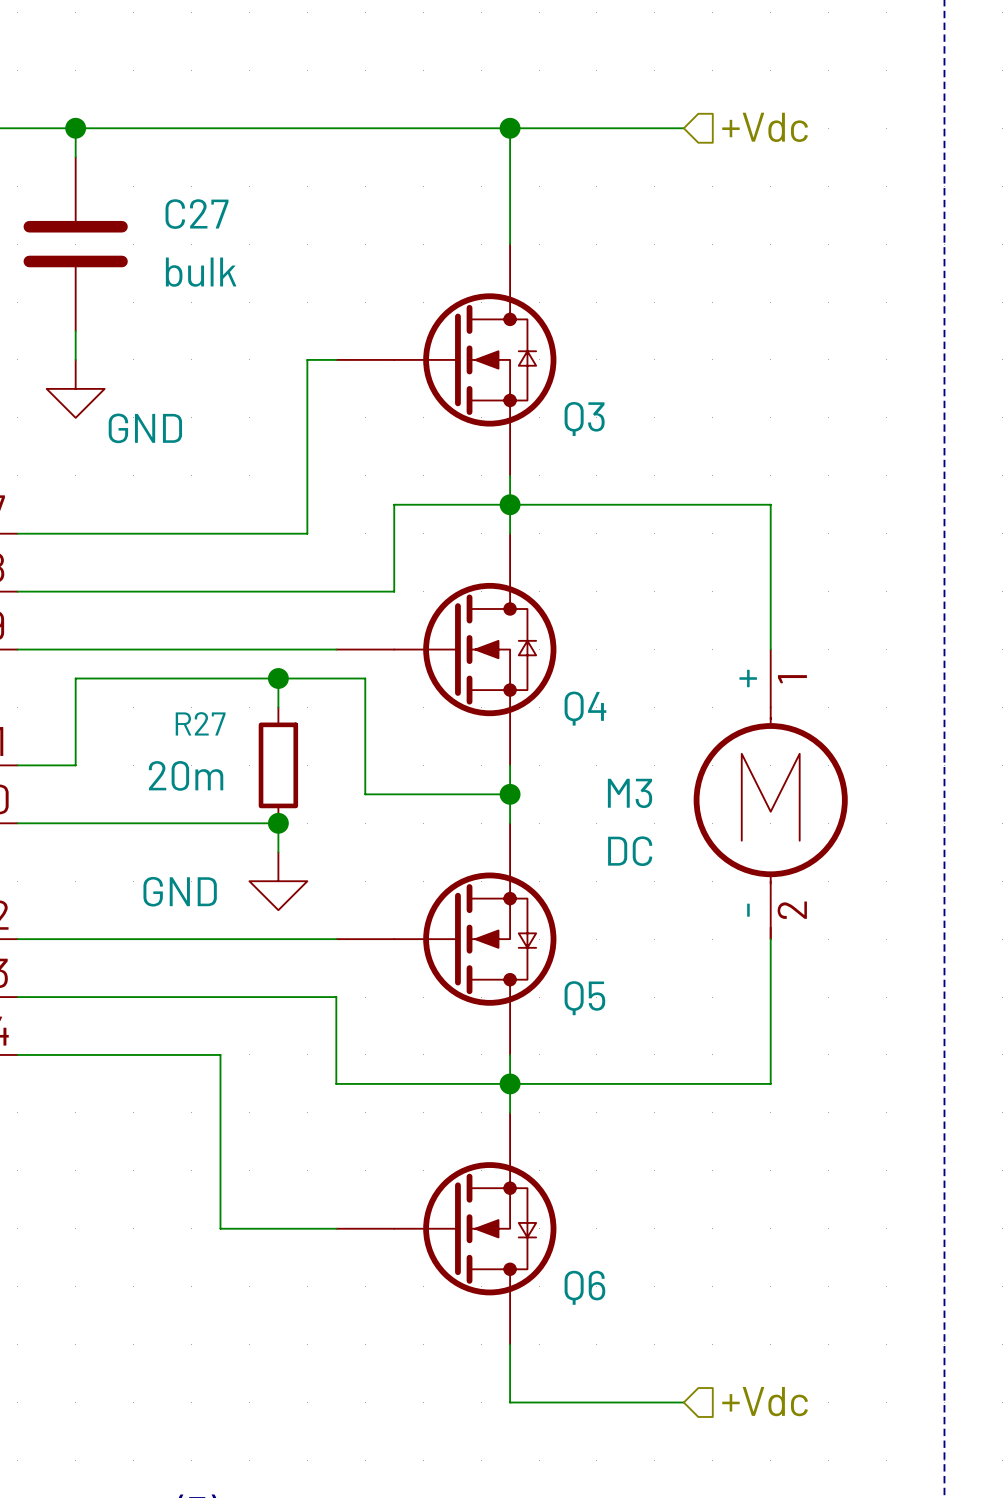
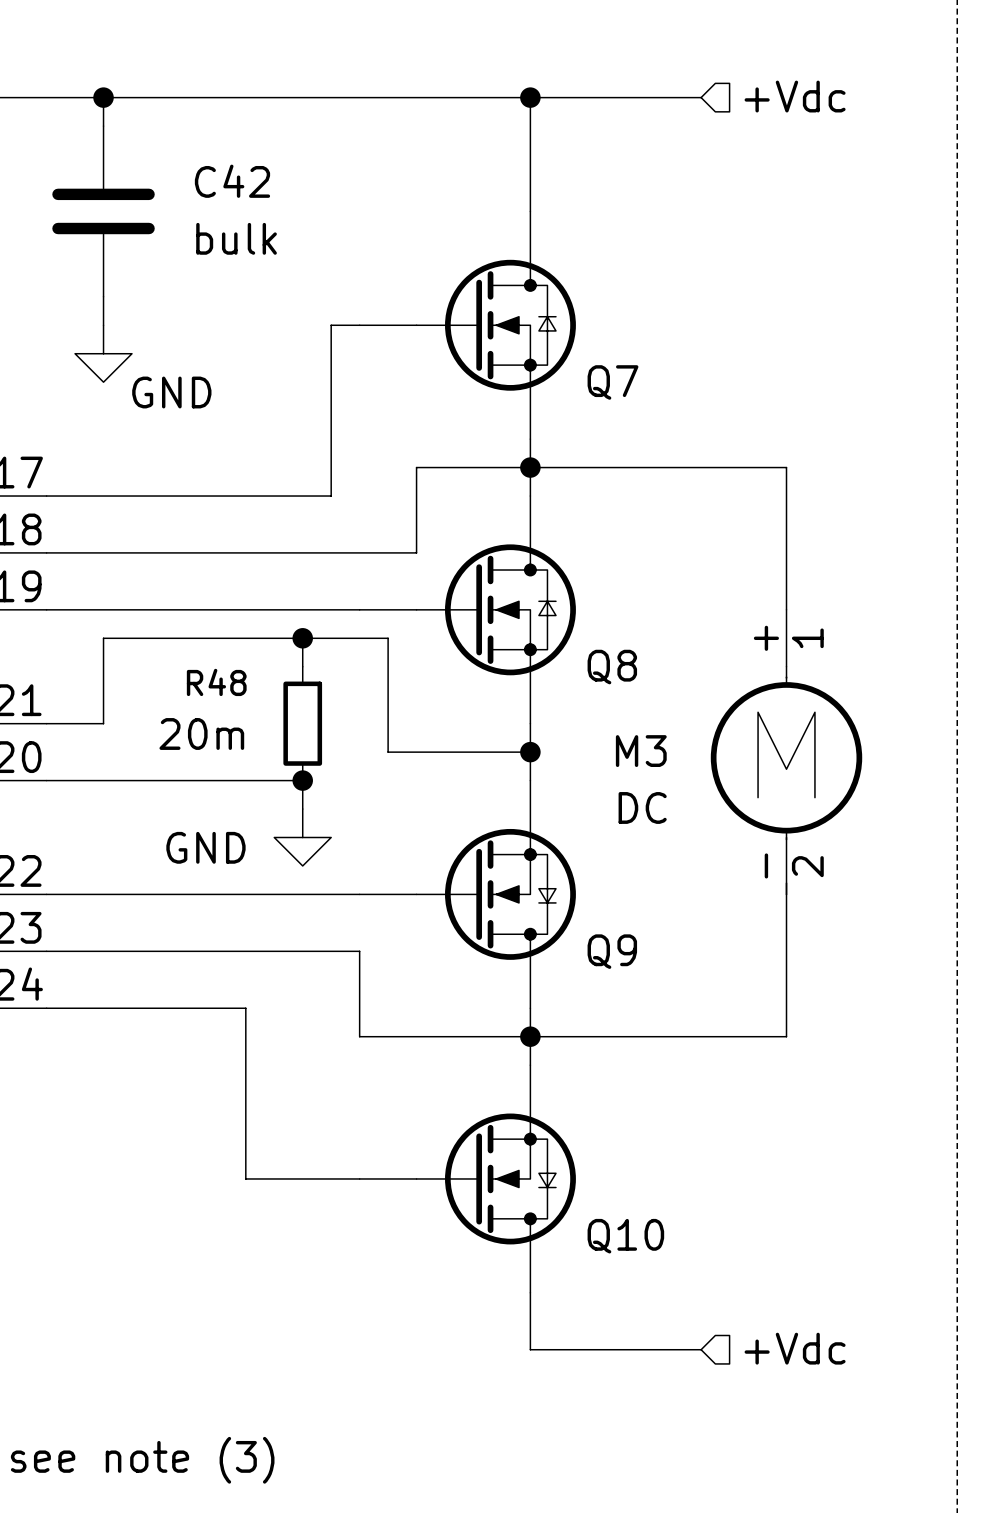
C27 name: C27 (197, 214) -> C42 (232, 181)
Q3 name: Q3 (584, 418) -> Q7 (612, 382)
Q4 name: Q4 (585, 708) -> Q8 (612, 667)
R27 name: R27 (200, 723) -> R48 (216, 682)
Q5 name: Q5 (584, 998) -> Q9 (612, 951)
Q6 name: Q6 (584, 1287) -> Q10 (625, 1236)

